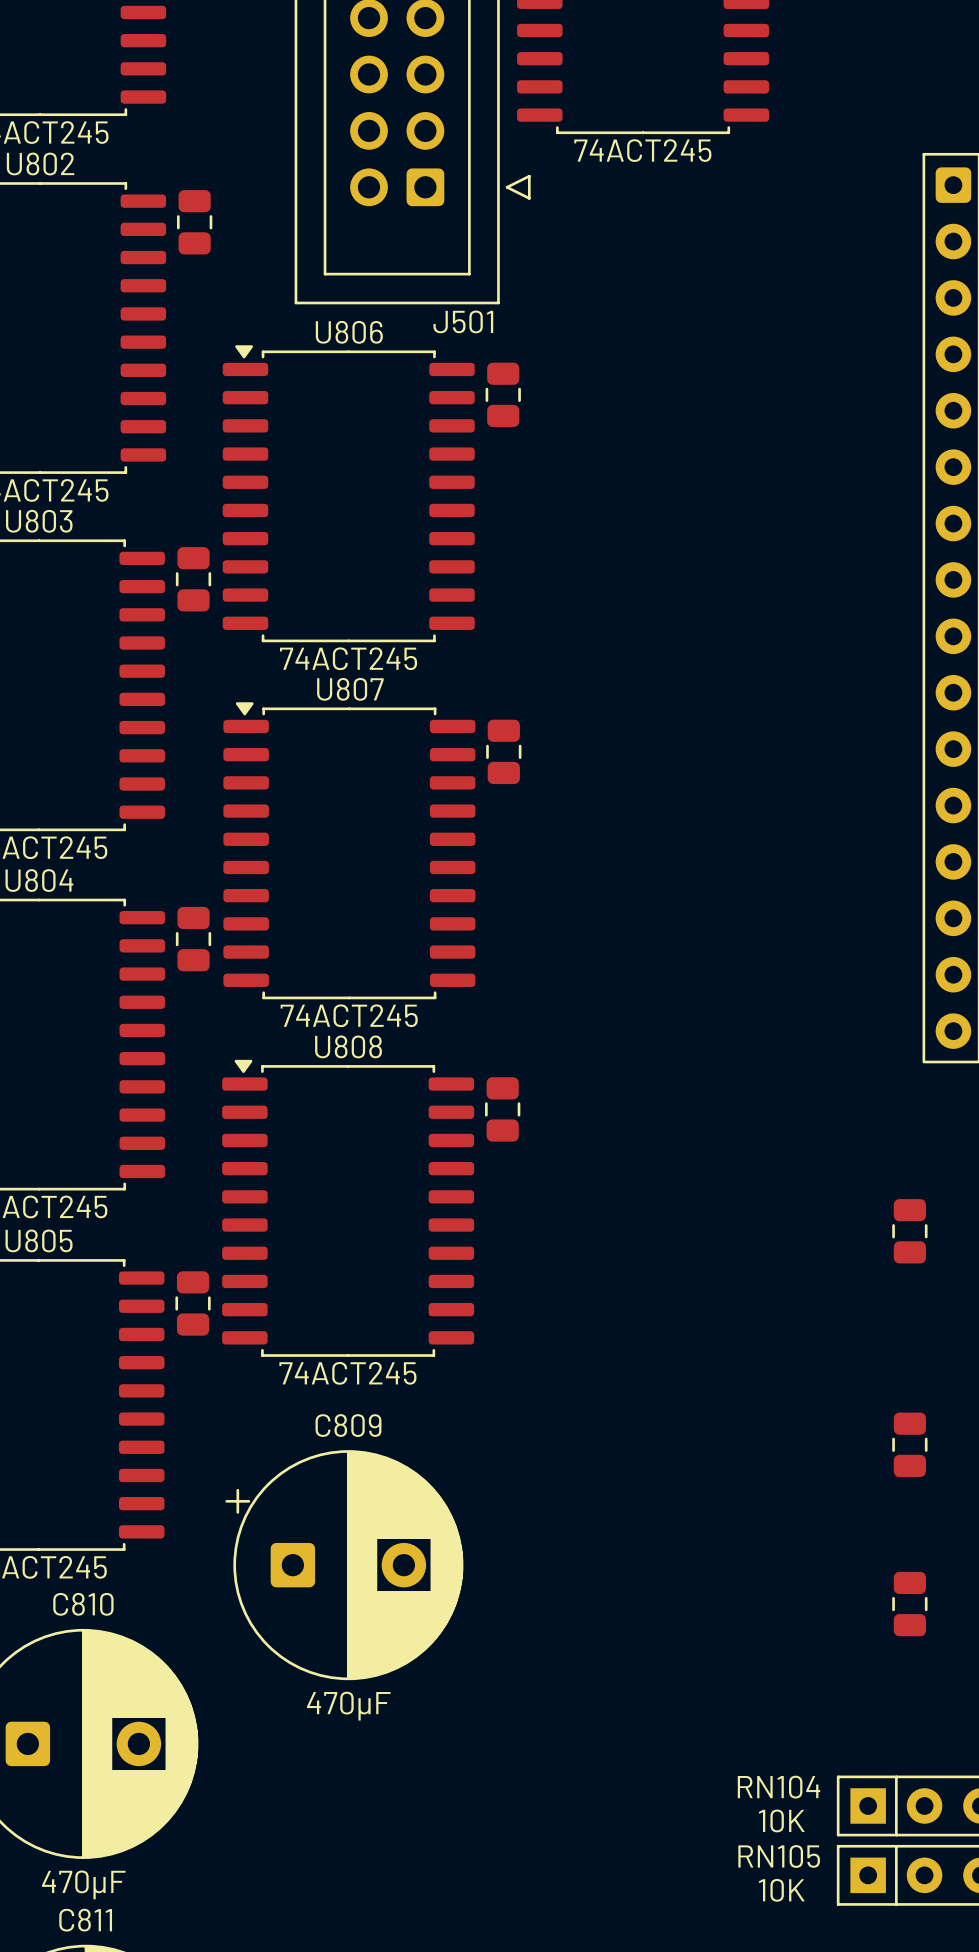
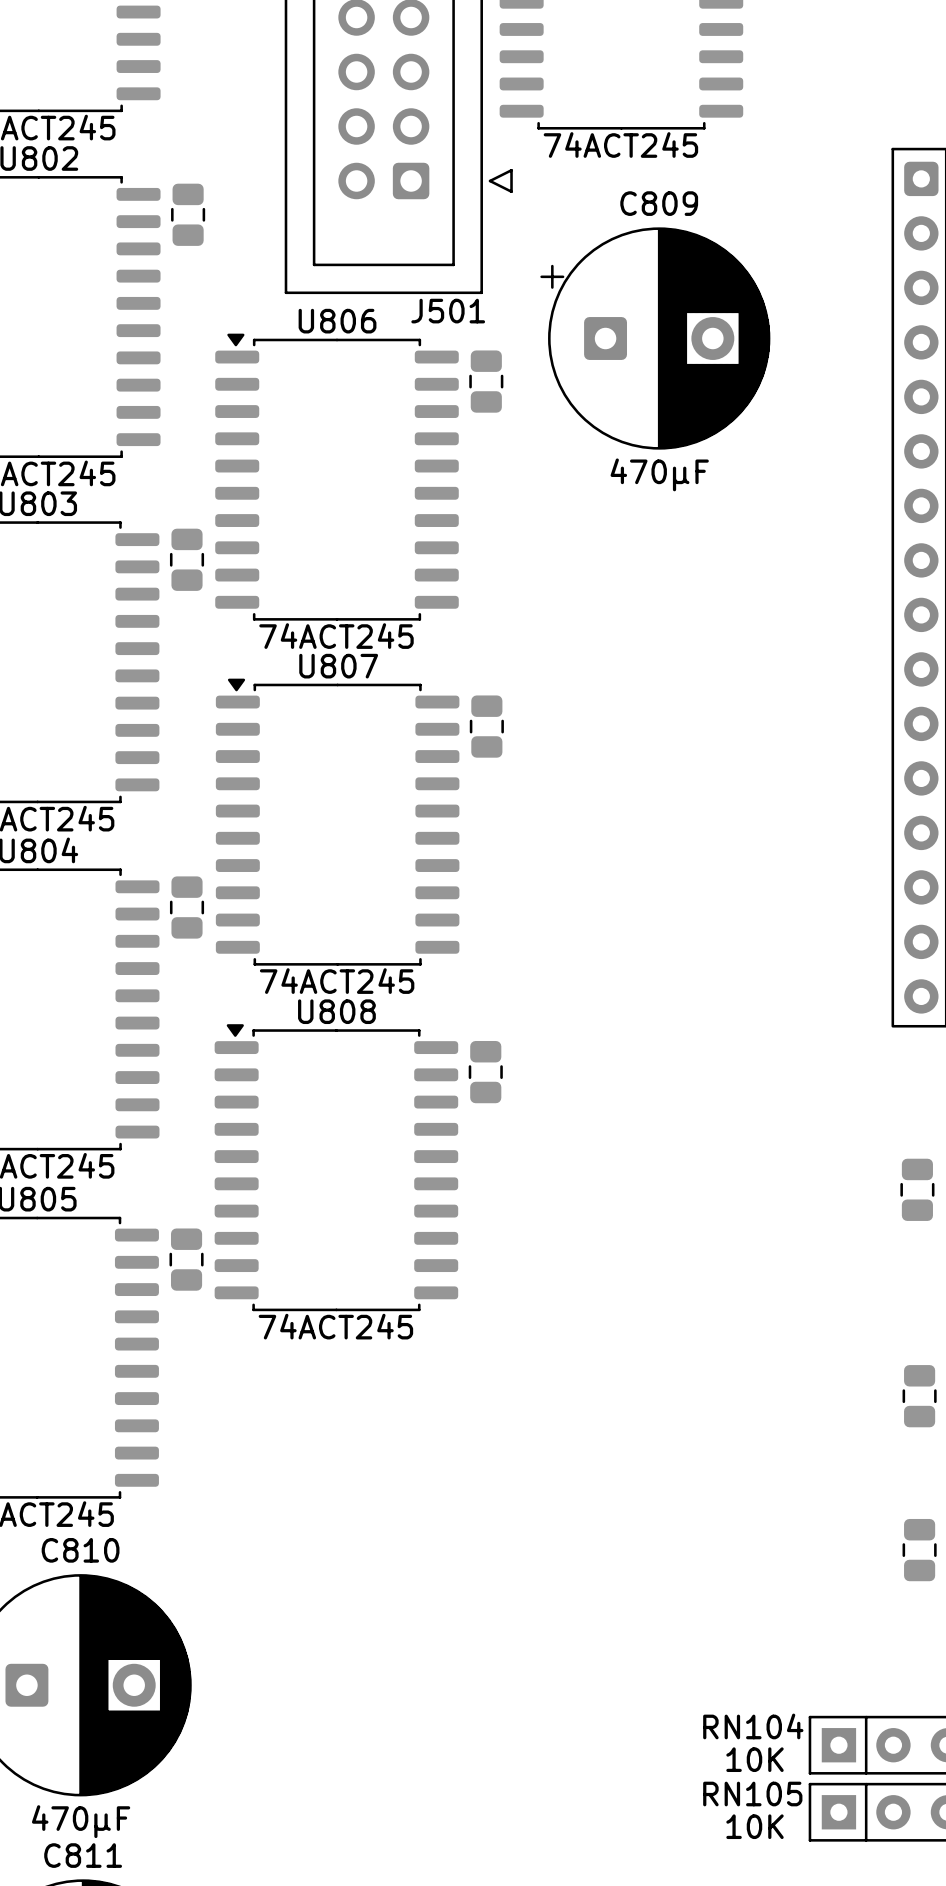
part position: (909, 1231) -> (917, 1189)
part position: (909, 1444) -> (919, 1396)
C809 position: (344, 1565) -> (655, 338)
part position: (909, 1604) -> (919, 1550)

